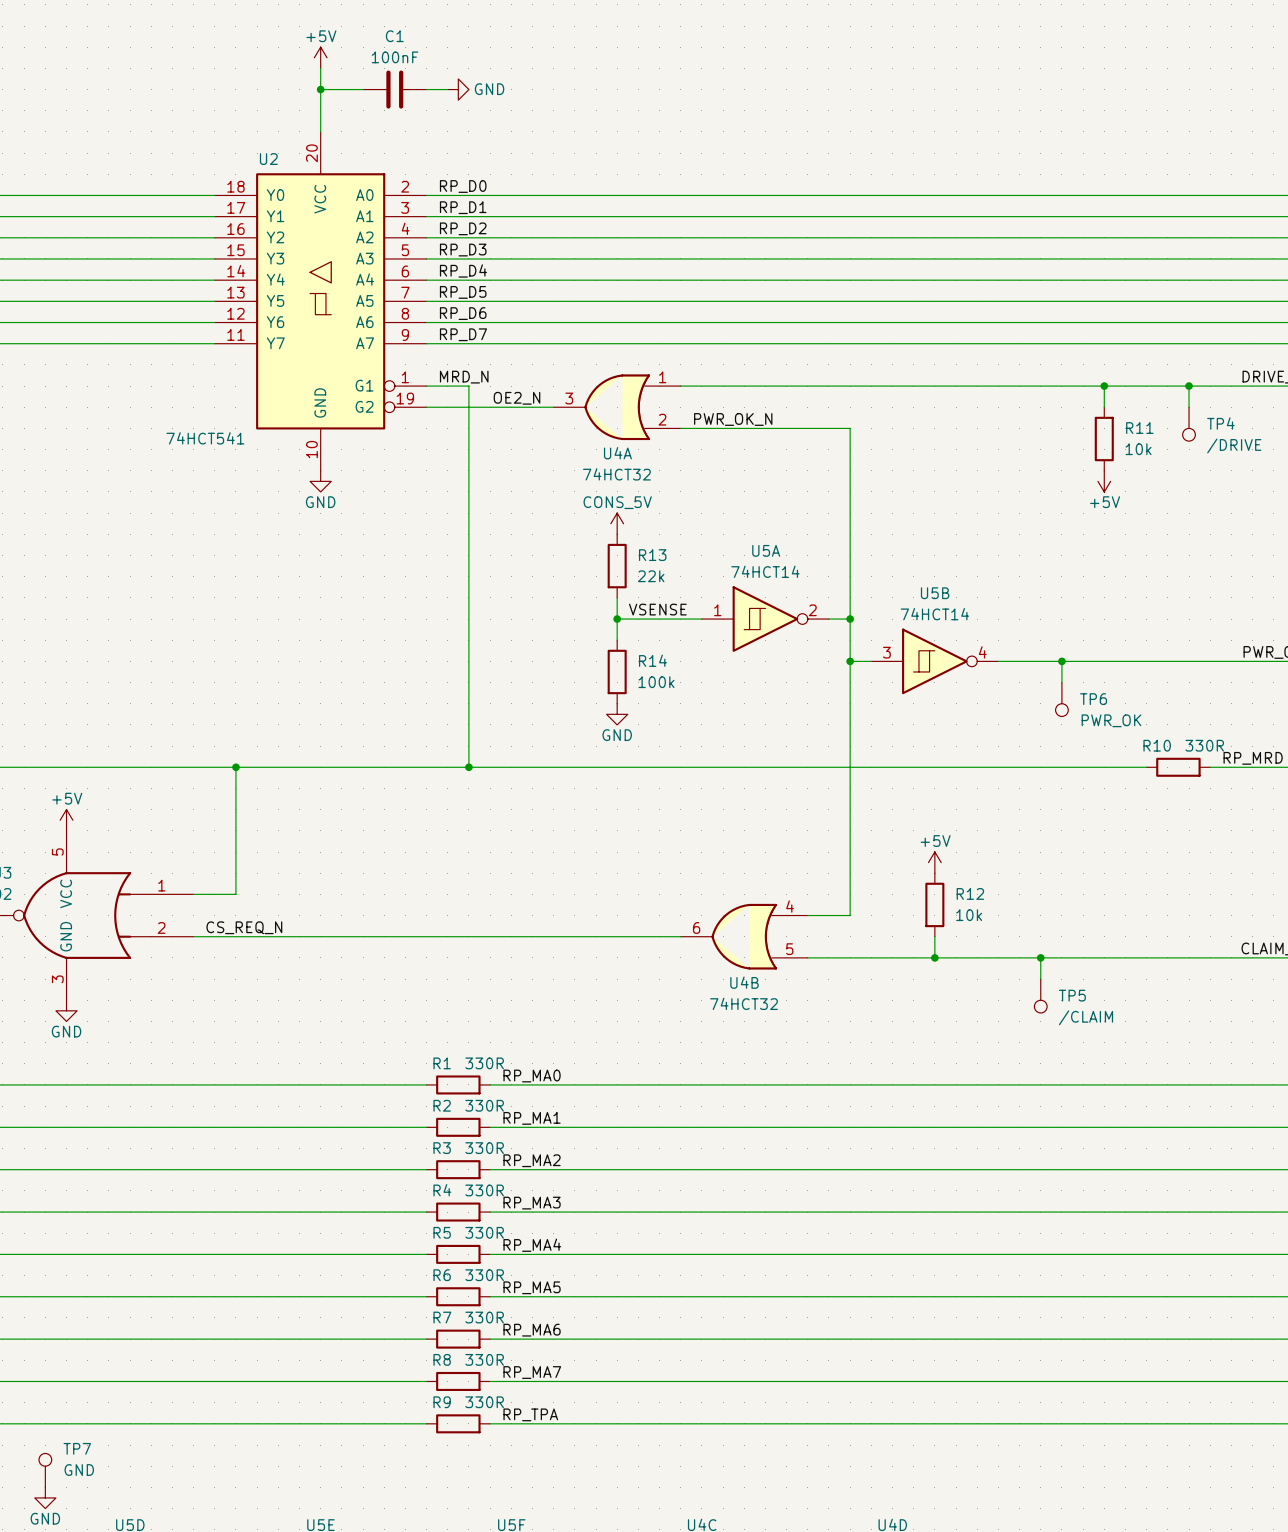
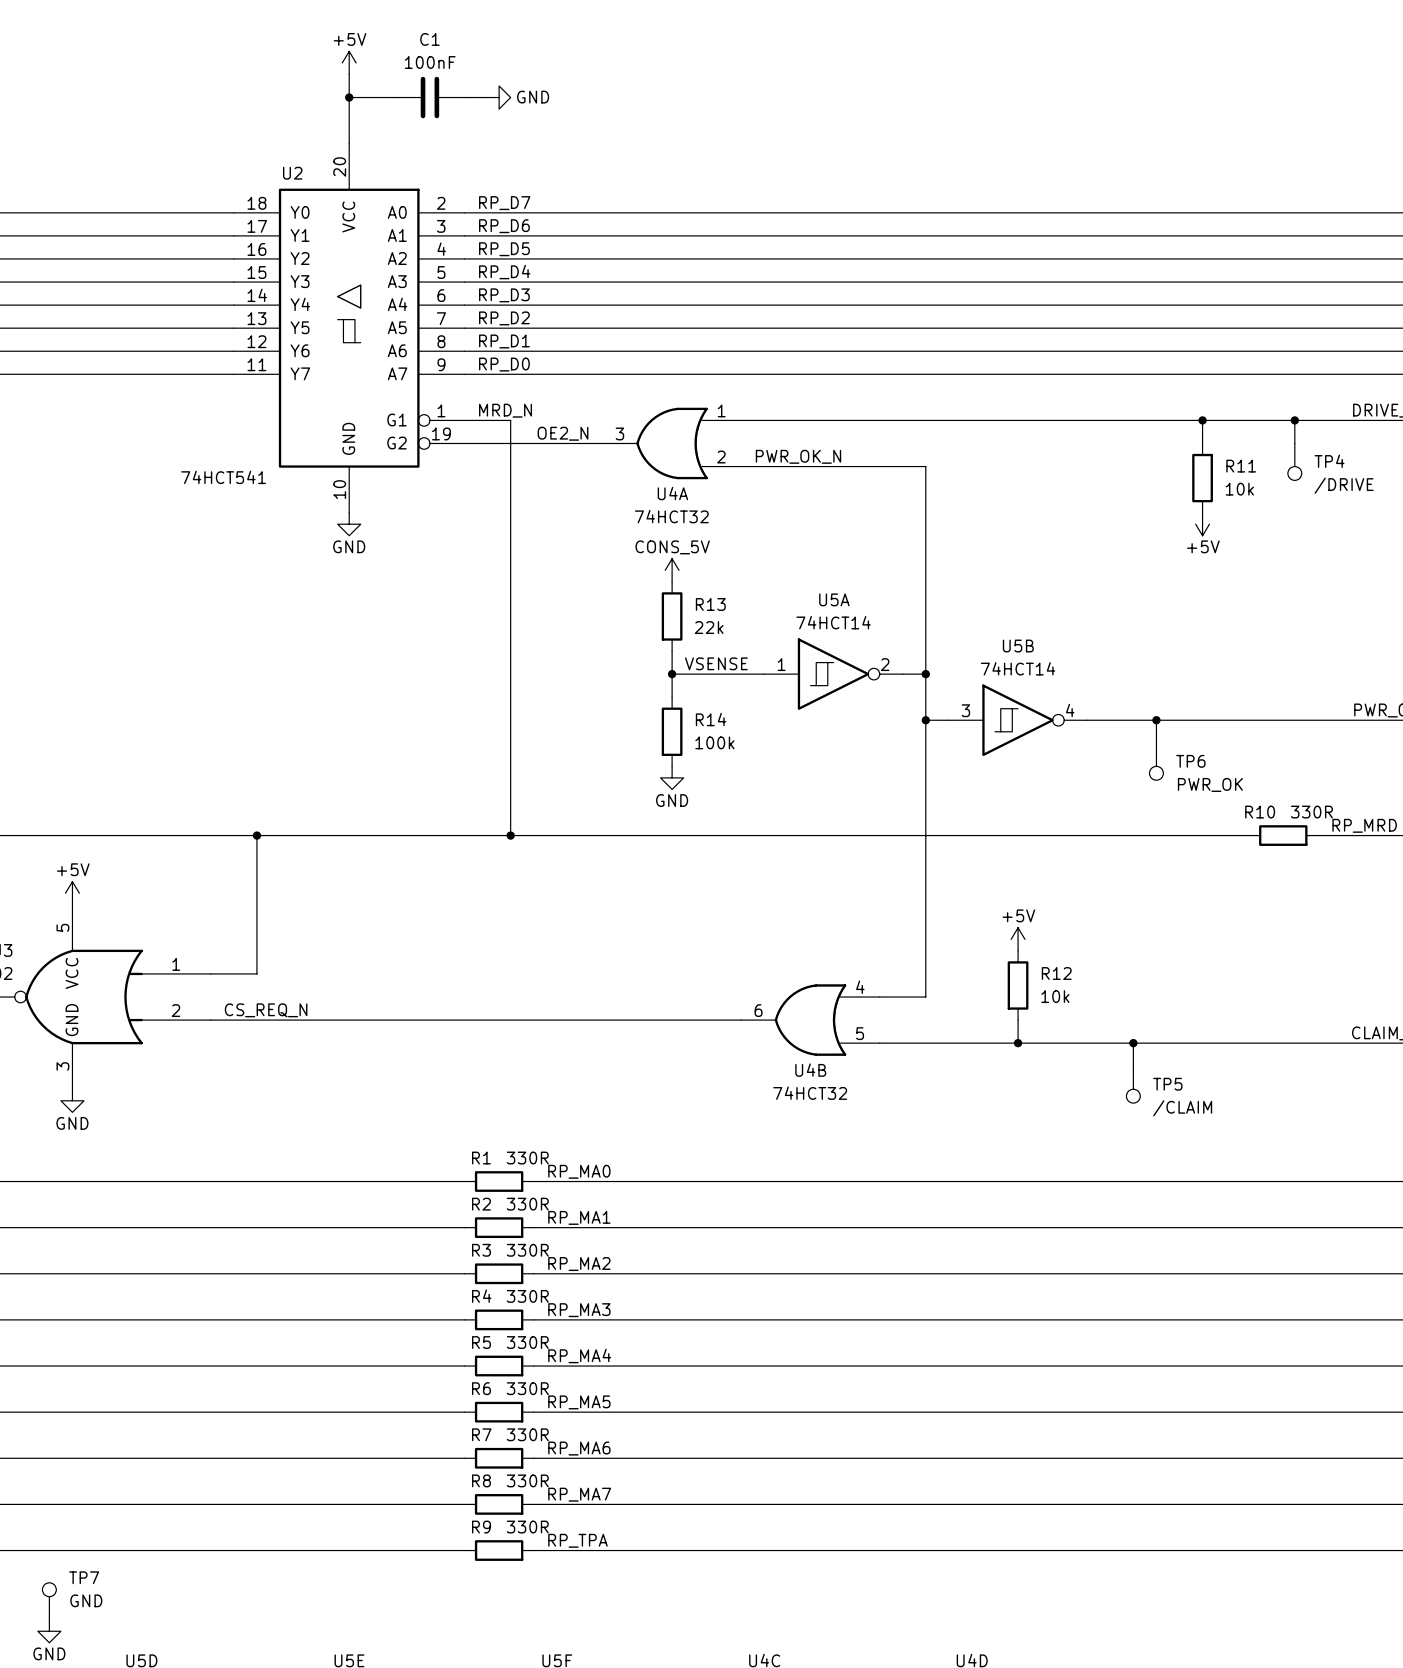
label: RP_D0 (463, 186) -> RP_D7 (504, 203)
label: RP_D1 (463, 207) -> RP_D6 (504, 226)
label: RP_D2 (463, 228) -> RP_D5 (504, 249)
label: RP_D3 (463, 250) -> RP_D4 (504, 272)
label: RP_D4 (463, 270) -> RP_D3 (504, 295)
label: RP_D5 (463, 292) -> RP_D2 (504, 318)
label: RP_D6 (463, 313) -> RP_D1 (504, 341)
label: RP_D7 (463, 334) -> RP_D0 (504, 364)

